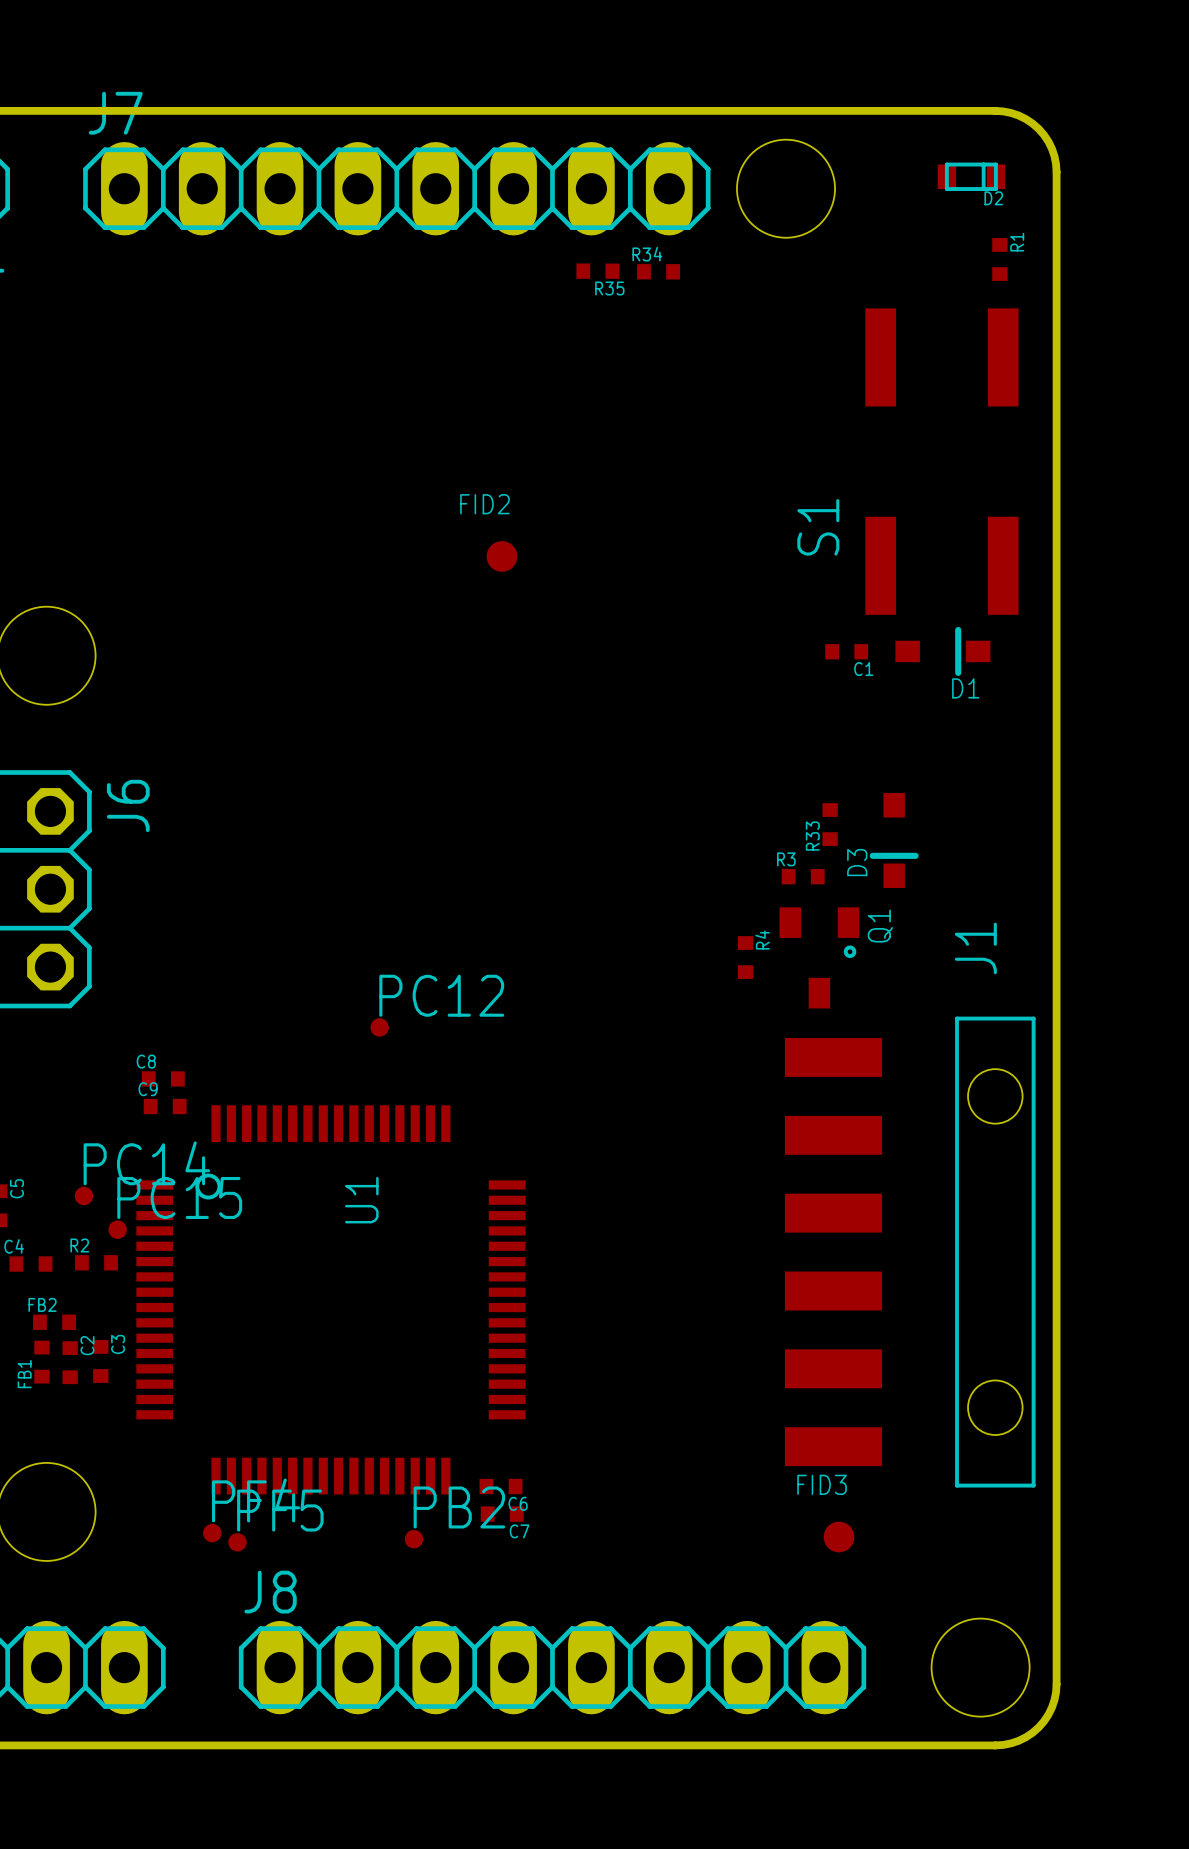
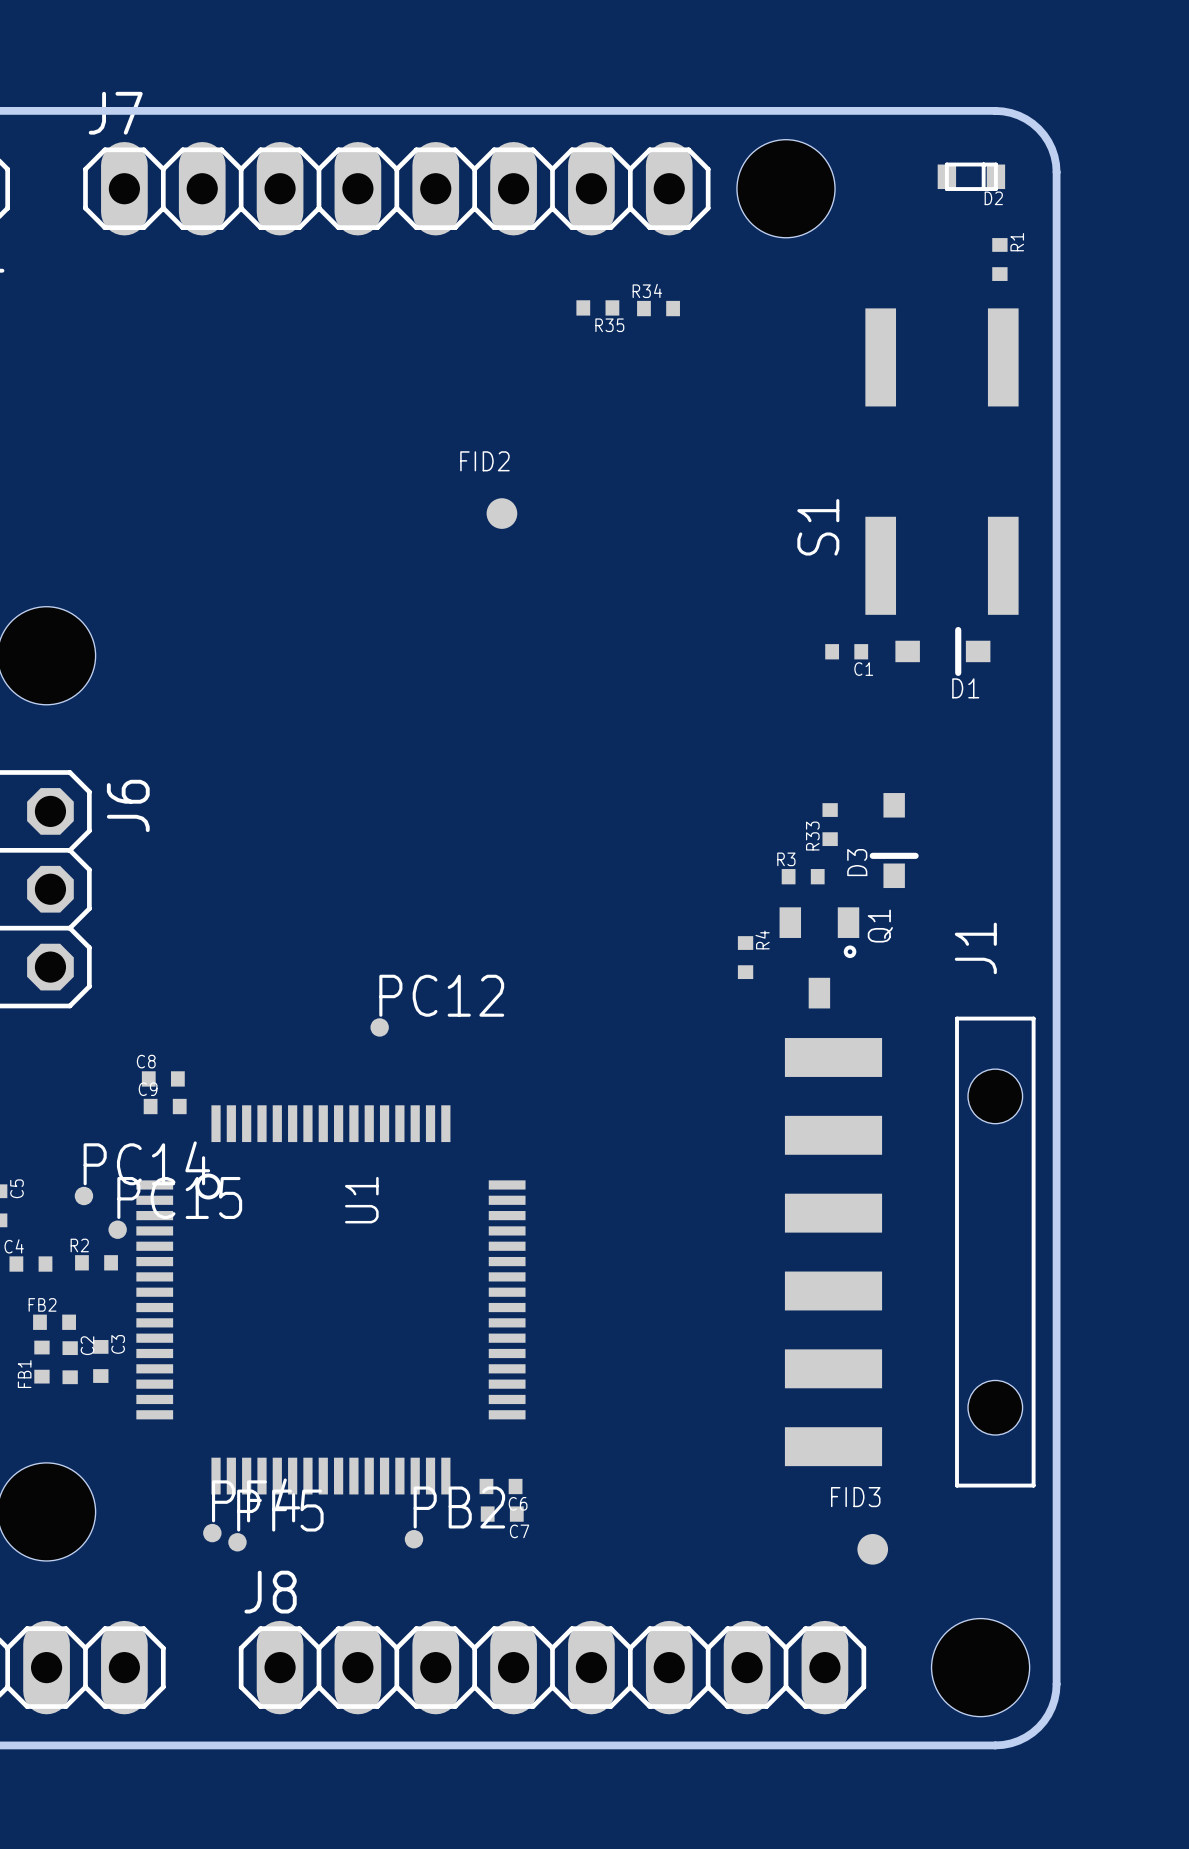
R35 position: (597, 271) -> (597, 307)
R34 position: (658, 271) -> (658, 308)
FID2 position: (501, 556) -> (501, 513)
FID3 position: (839, 1537) -> (872, 1549)

